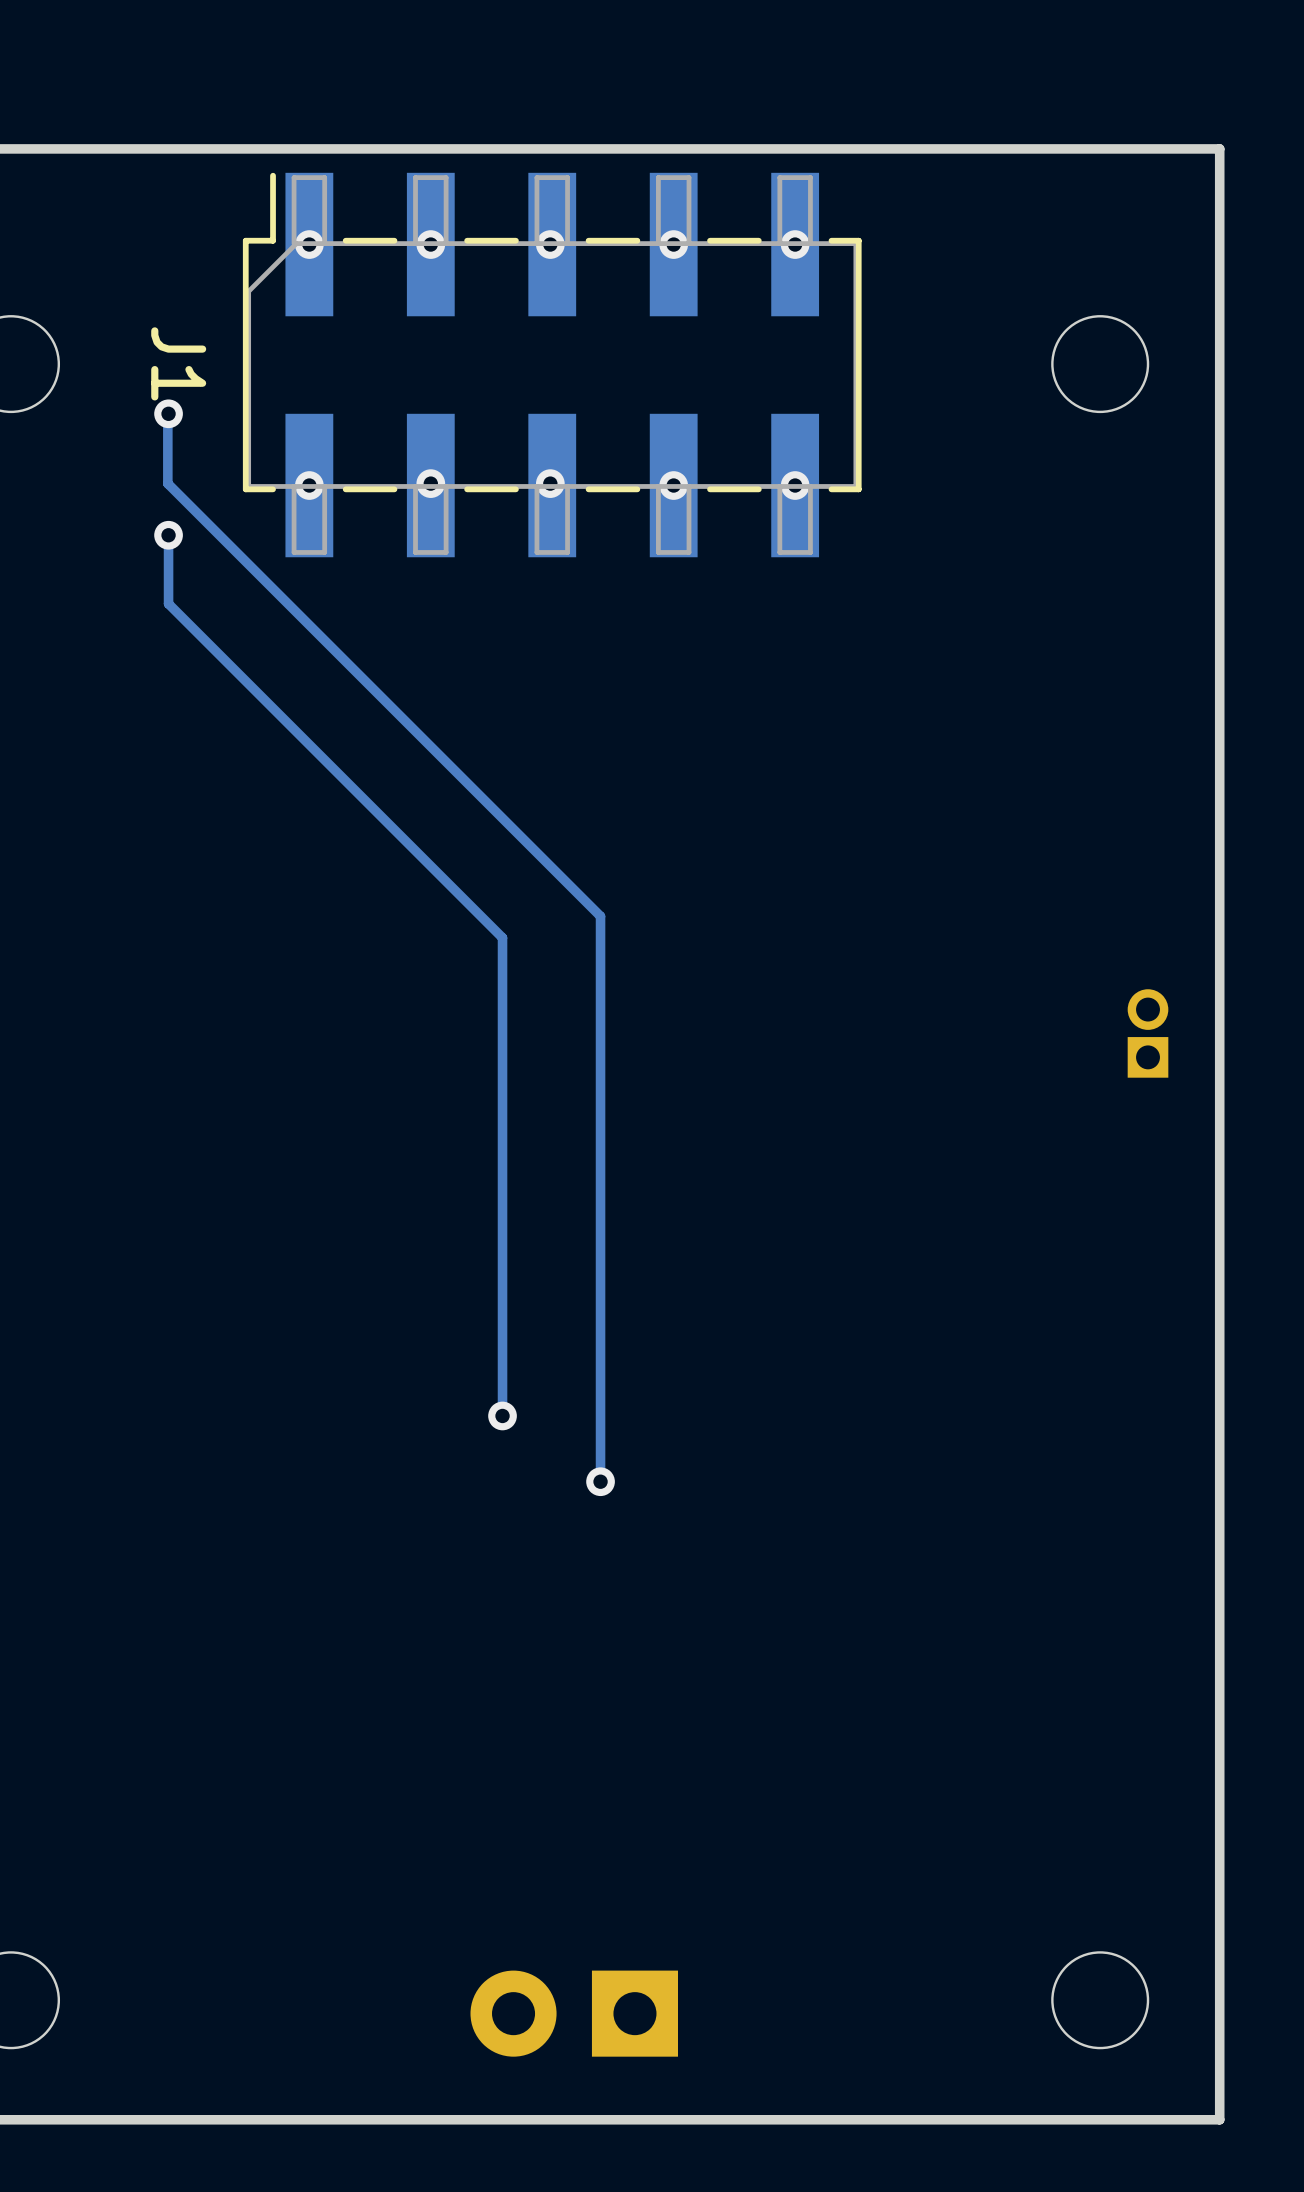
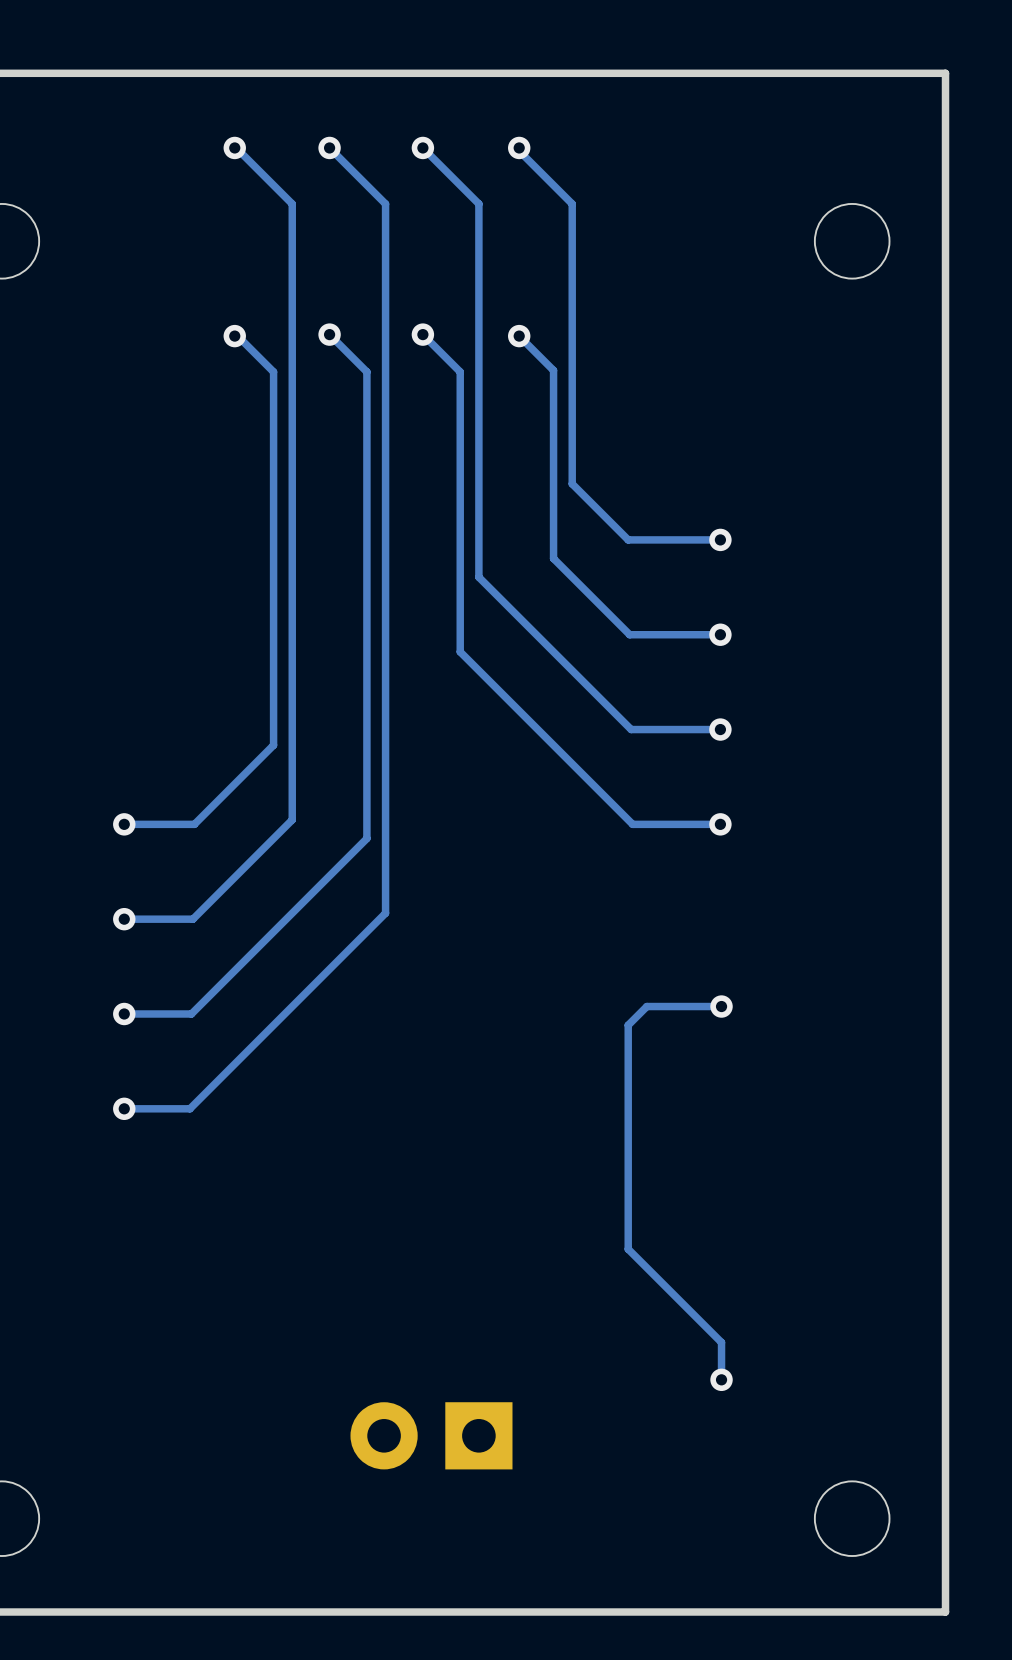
track: none -> (234, 147) (292, 203) (292, 819) (192, 919) (124, 919)
track: none -> (424, 147) (478, 203) (478, 577) (631, 729) (720, 729)
track: none -> (516, 147) (572, 203) (572, 483) (628, 539) (720, 539)
via: (795, 244) -> none
J1: (552, 365) -> none
track: (168, 413) (167, 483) (600, 916) (600, 1485) (598, 1487) -> none
via: (168, 413) -> none
track: none -> (329, 336) (366, 371) (366, 838) (191, 1013) (124, 1013)
track: none -> (424, 336) (460, 371) (460, 651) (632, 824) (720, 824)
track: none -> (519, 336) (553, 370) (553, 558) (629, 634) (720, 634)
via: (795, 485) -> none
track: none -> (236, 337) (234, 336) (237, 336) (273, 371) (273, 745) (194, 824) (124, 824)
track: (168, 535) (168, 603) (502, 937) -> (329, 147) (385, 203) (385, 689)
via: (168, 535) -> none
via: none -> (720, 539)
via: none -> (720, 634)
via: none -> (720, 729)
part: (1148, 1033) -> none
via: none -> (124, 824)
via: none -> (720, 824)
track: (502, 1224) (502, 1415) -> (385, 913) (189, 1108) (124, 1108)
via: none -> (124, 919)
track: none -> (721, 1006) (646, 1006) (628, 1025) (628, 1249) (721, 1342) (721, 1379)
via: none -> (721, 1006)
via: none -> (124, 1013)
via: (502, 1415) -> none
via: none -> (124, 1108)
via: (600, 1481) -> none
via: none -> (721, 1379)
part position: (574, 2013) -> (431, 1435)

